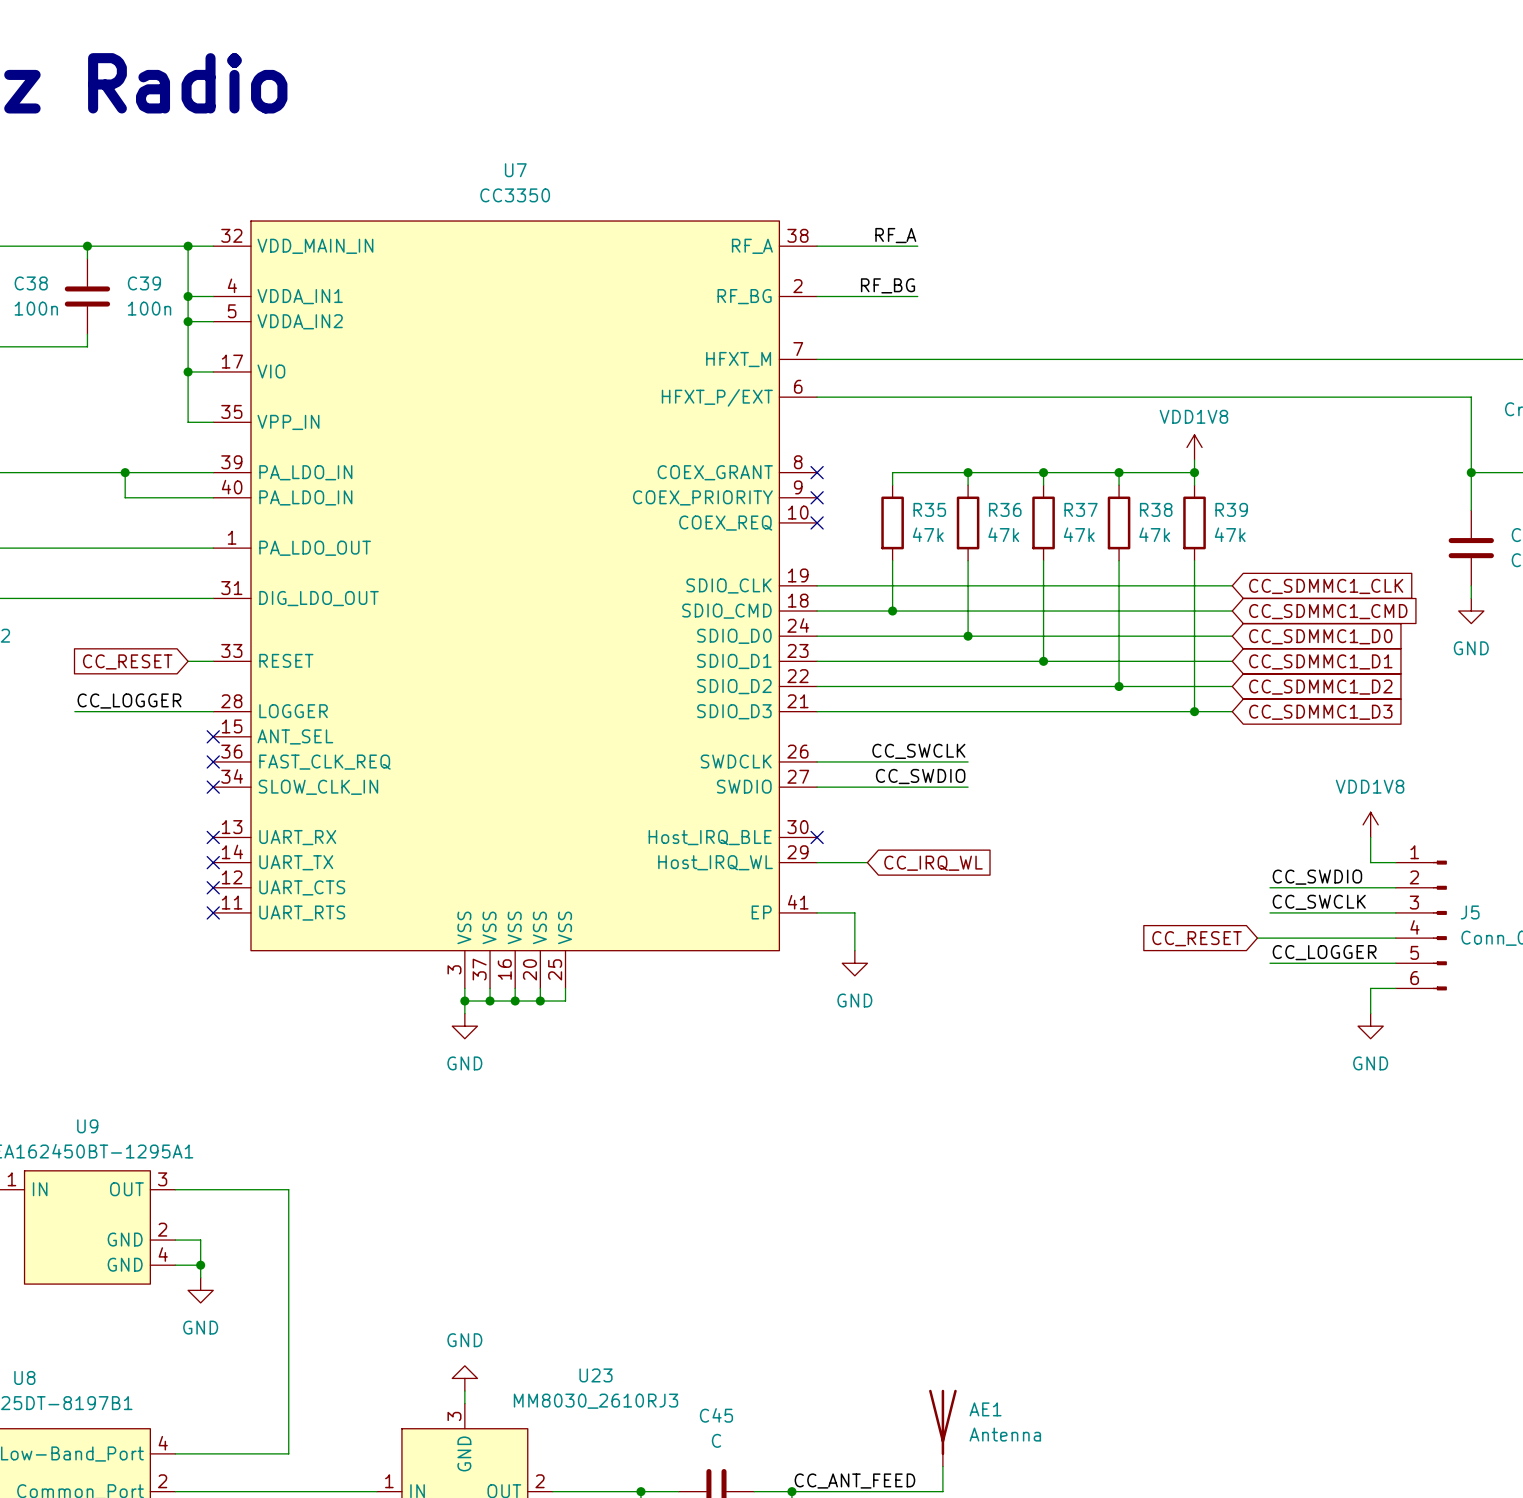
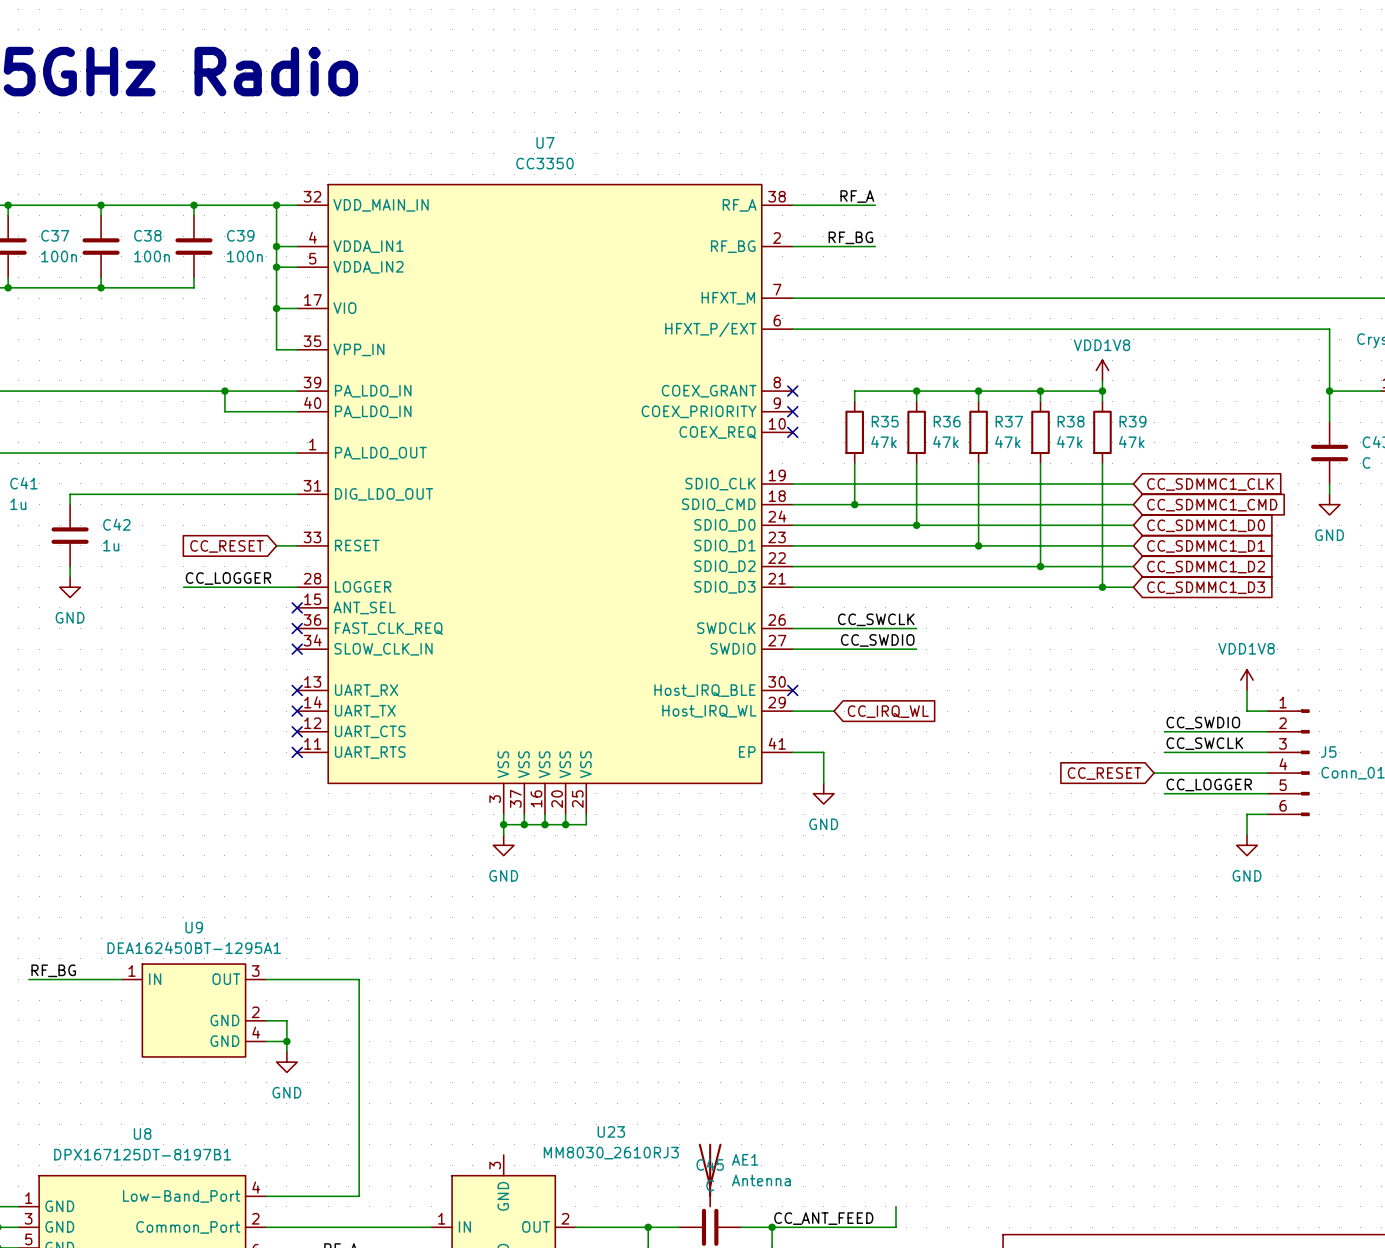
power symbol: GND (464, 1378) -> none
wire: (464, 1391) (464, 1403) -> none
AE1 position: (942, 1428) -> (710, 1175)

